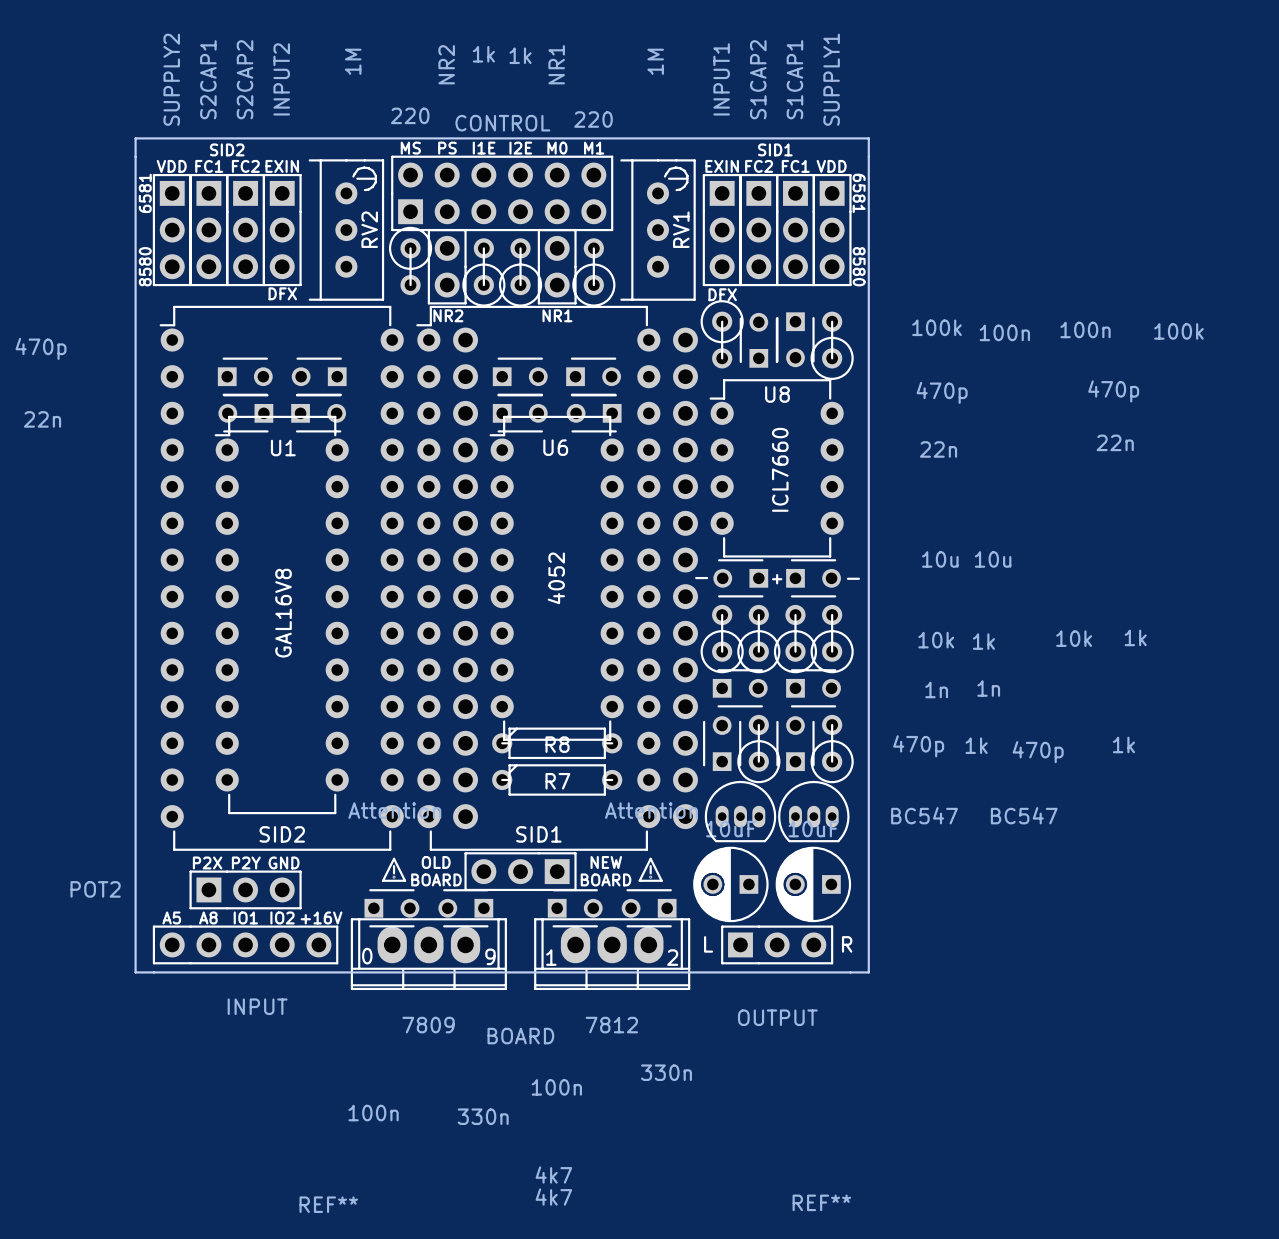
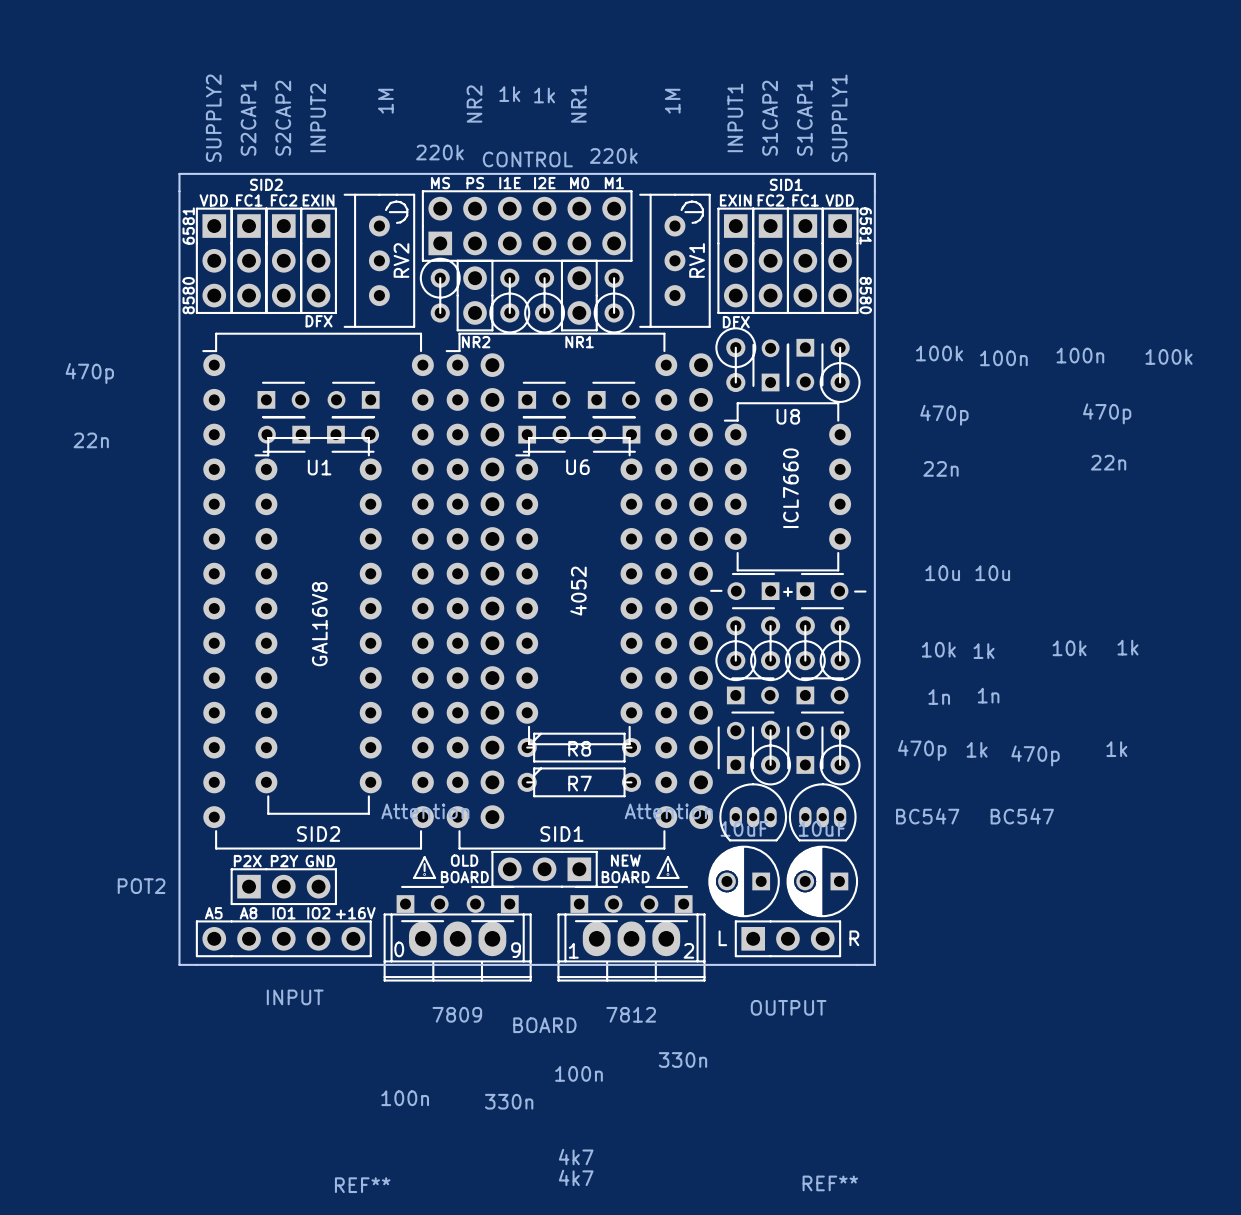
part value: 220 (410, 115) -> 220k (439, 152)
part value: 220 (593, 119) -> 220k (613, 155)

